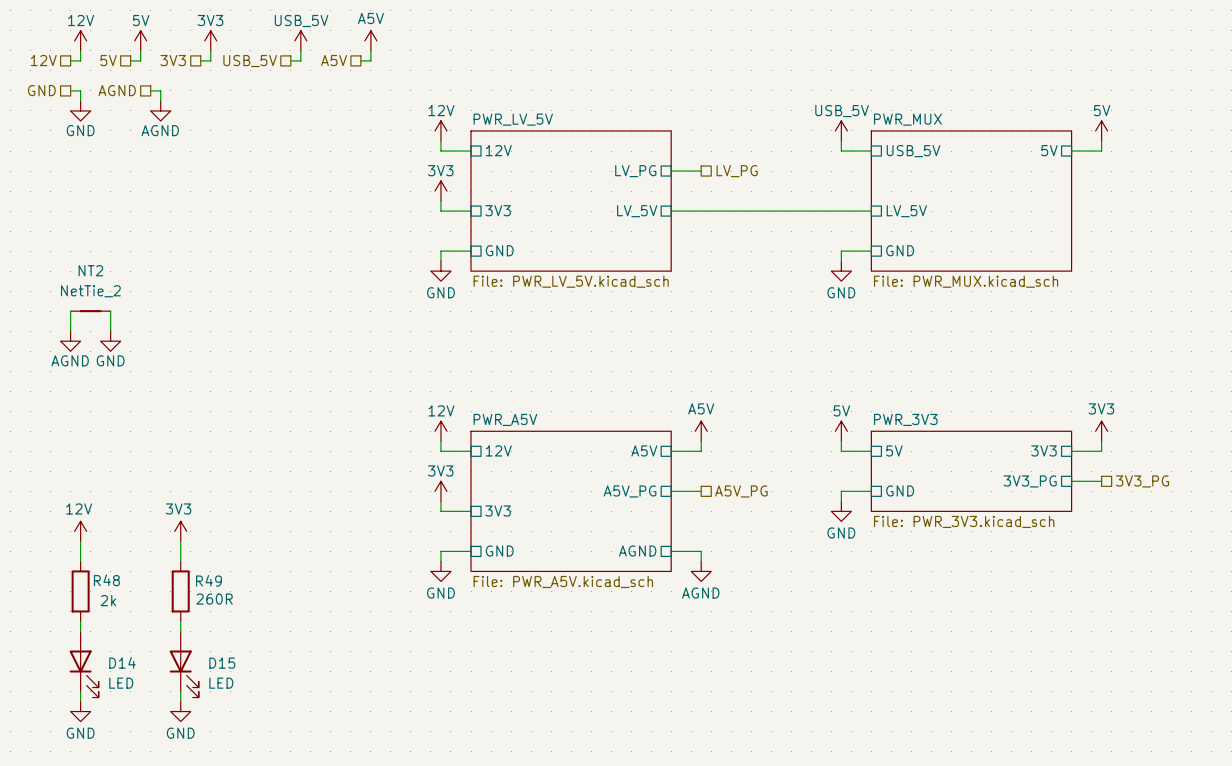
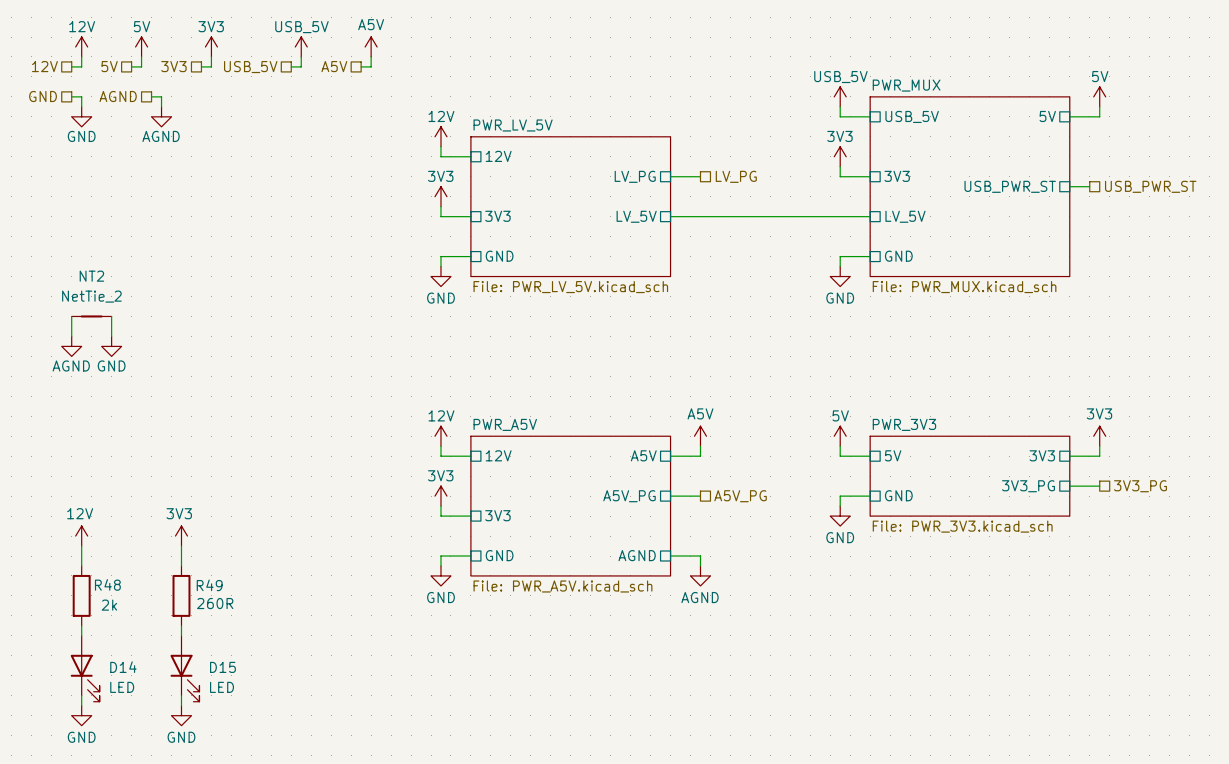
power symbol position: USB_5V (841, 130) -> USB_5V (840, 96)
power symbol position: 5V (1101, 130) -> 5V (1099, 96)
wire: (841, 141) (841, 151) (871, 151) -> (840, 106) (840, 116) (870, 116)
wire: (1101, 141) (1101, 151) (1071, 151) -> (1099, 106) (1099, 116) (1069, 116)
sheet pin position: 5V (1049, 150) -> 5V (1047, 116)
power symbol: none -> 3V3 (840, 156)
sheet pin position: USB_5V (913, 151) -> USB_5V (912, 116)
wire: none -> (840, 166) (840, 176) (870, 176)
sheet pin: none -> 3V3 (897, 176)
sheet PWR_MUX: none -> File: PWR_MUX.kicad_sch (969, 186)
sheet pin: none -> USB_PWR_ST (1010, 186)
wire: none -> (1069, 186) (1089, 186)
hierarchical label: none -> USB_PWR_ST (1150, 186)
sheet PWR_MUX: File: PWR_MUX.kicad_sch (971, 201) -> none

